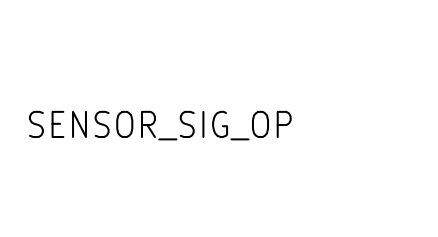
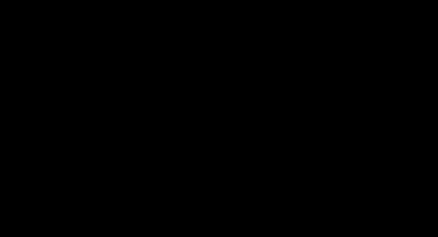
label: SENSOR_SIG_OP (160, 125) -> none

